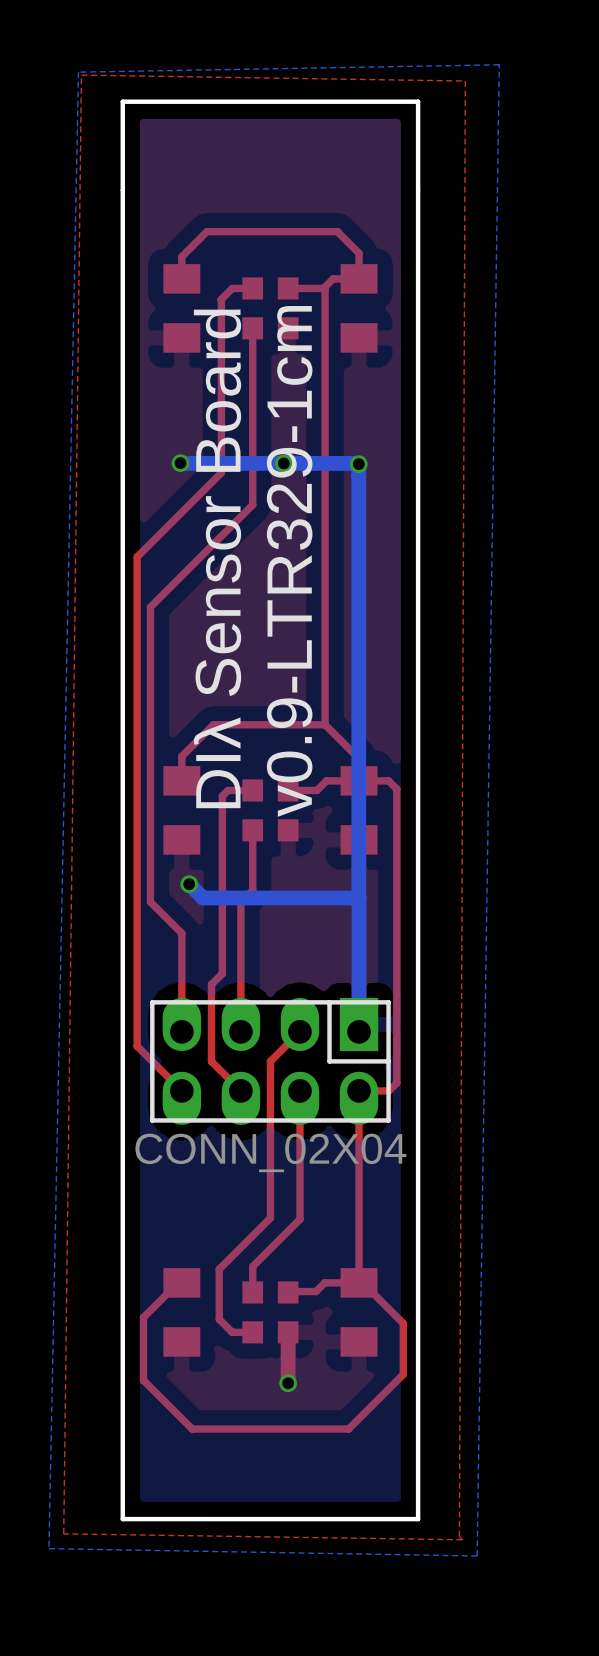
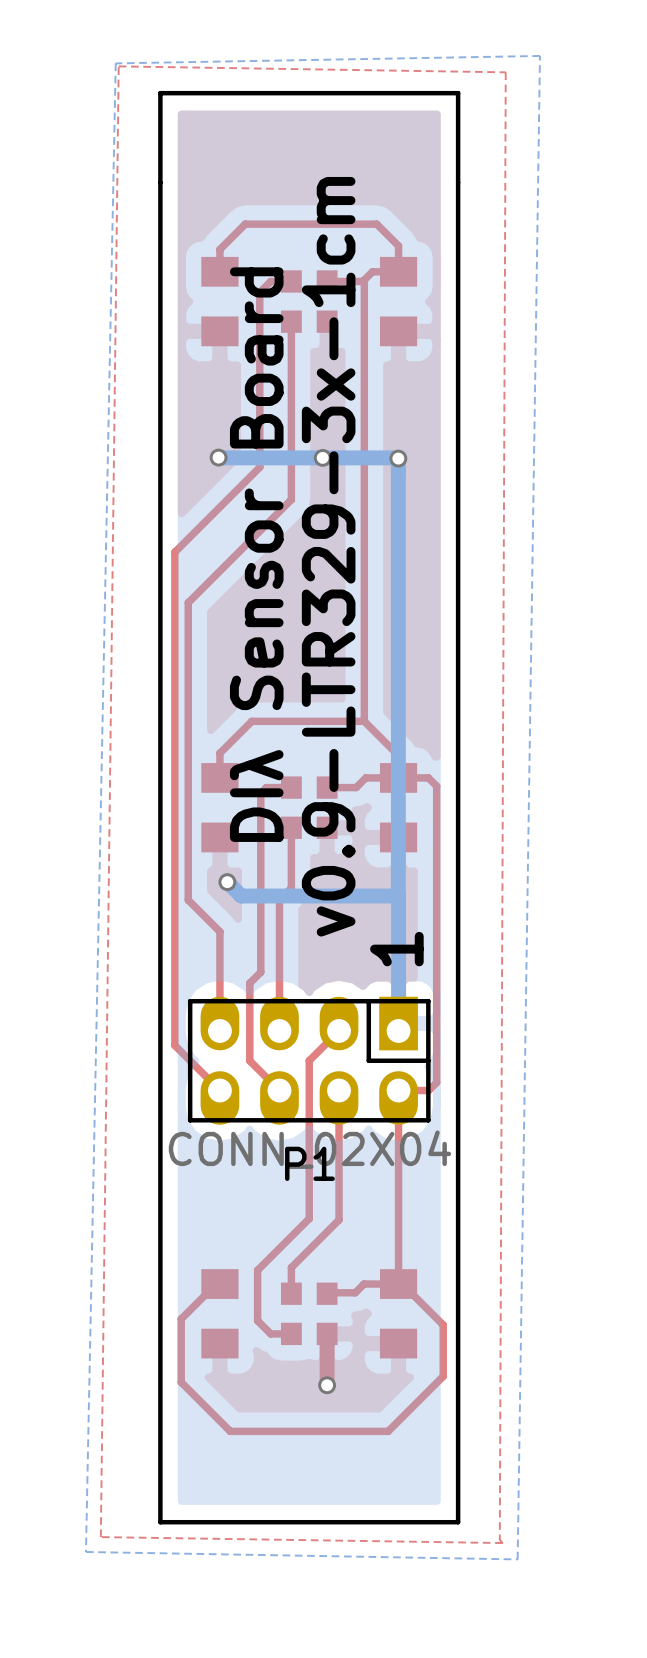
text: v0.9-LTR329-1cm (289, 561) -> v0.9-LTR329-3x-1cm (328, 556)
text: none -> 1 (396, 949)
P1 name: none -> P1 (309, 1163)

